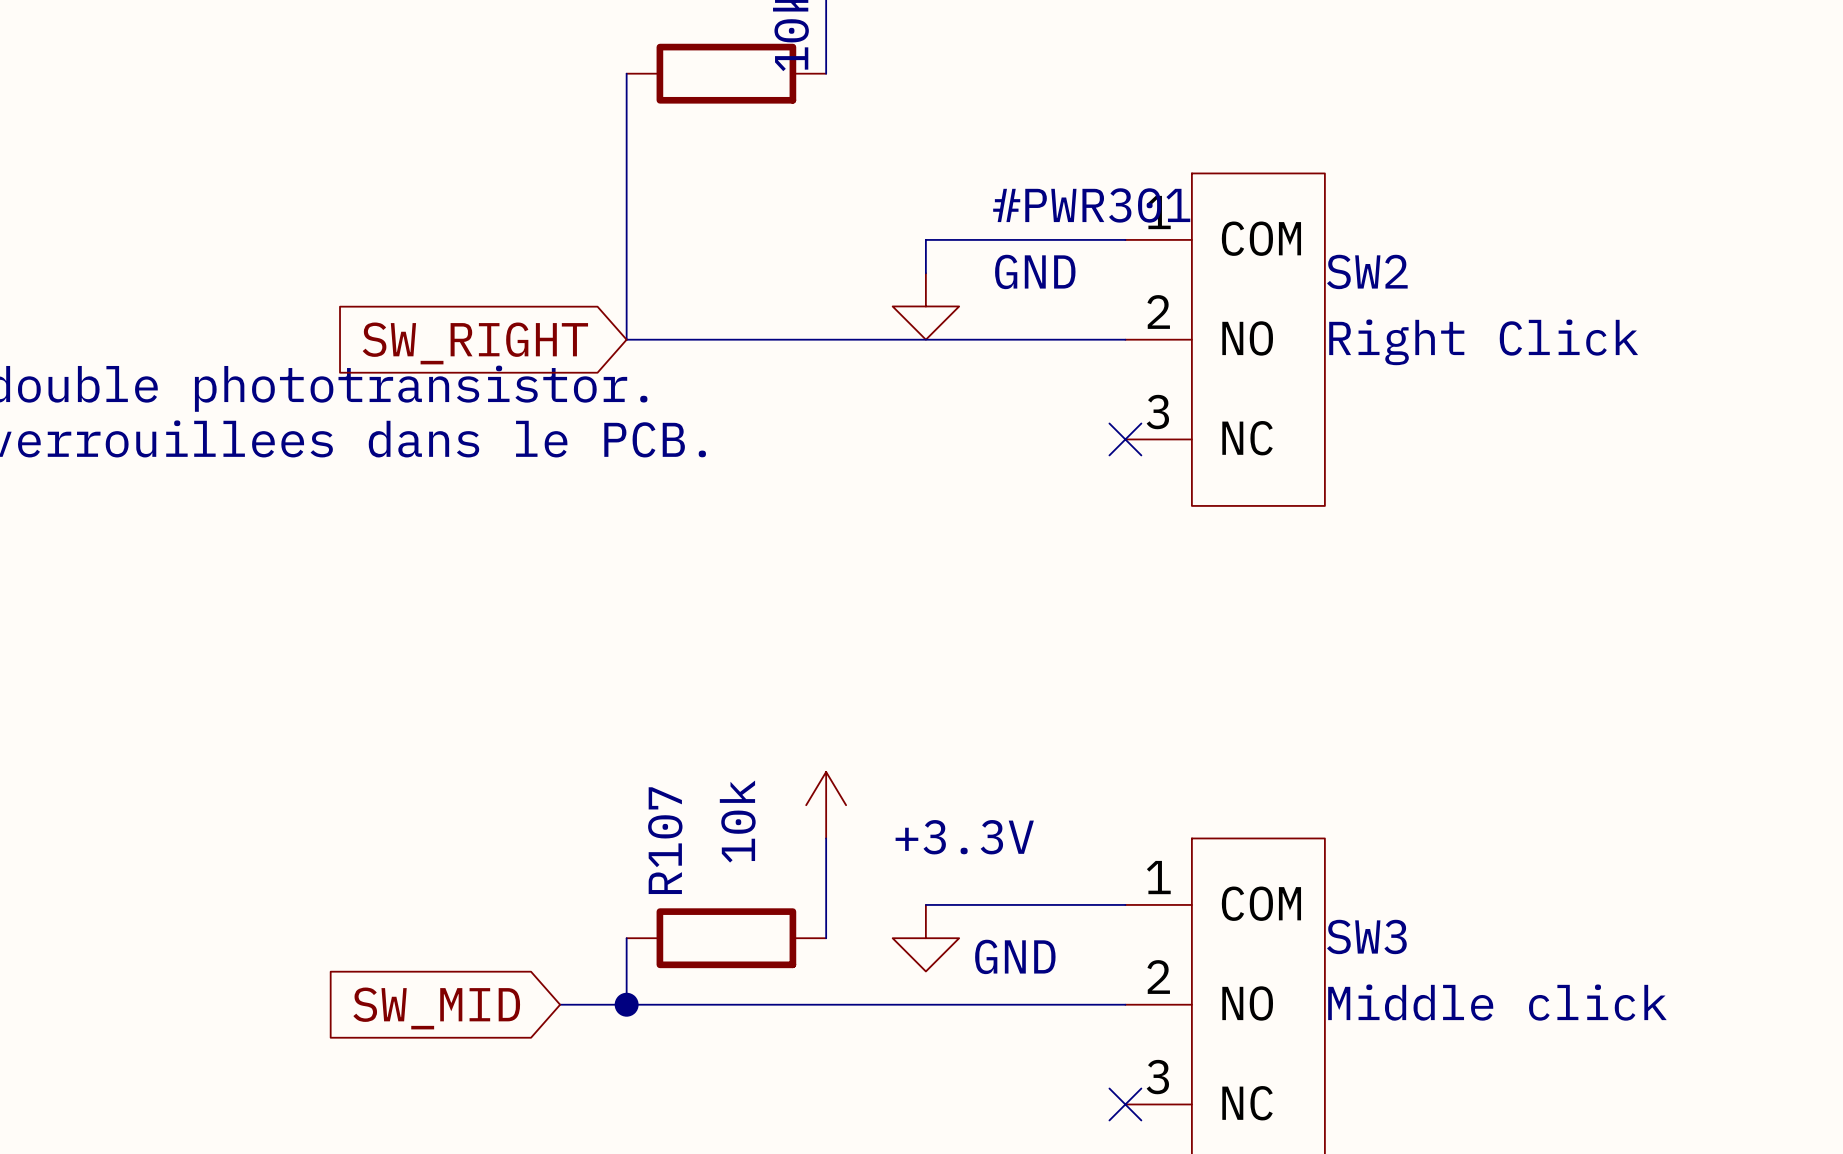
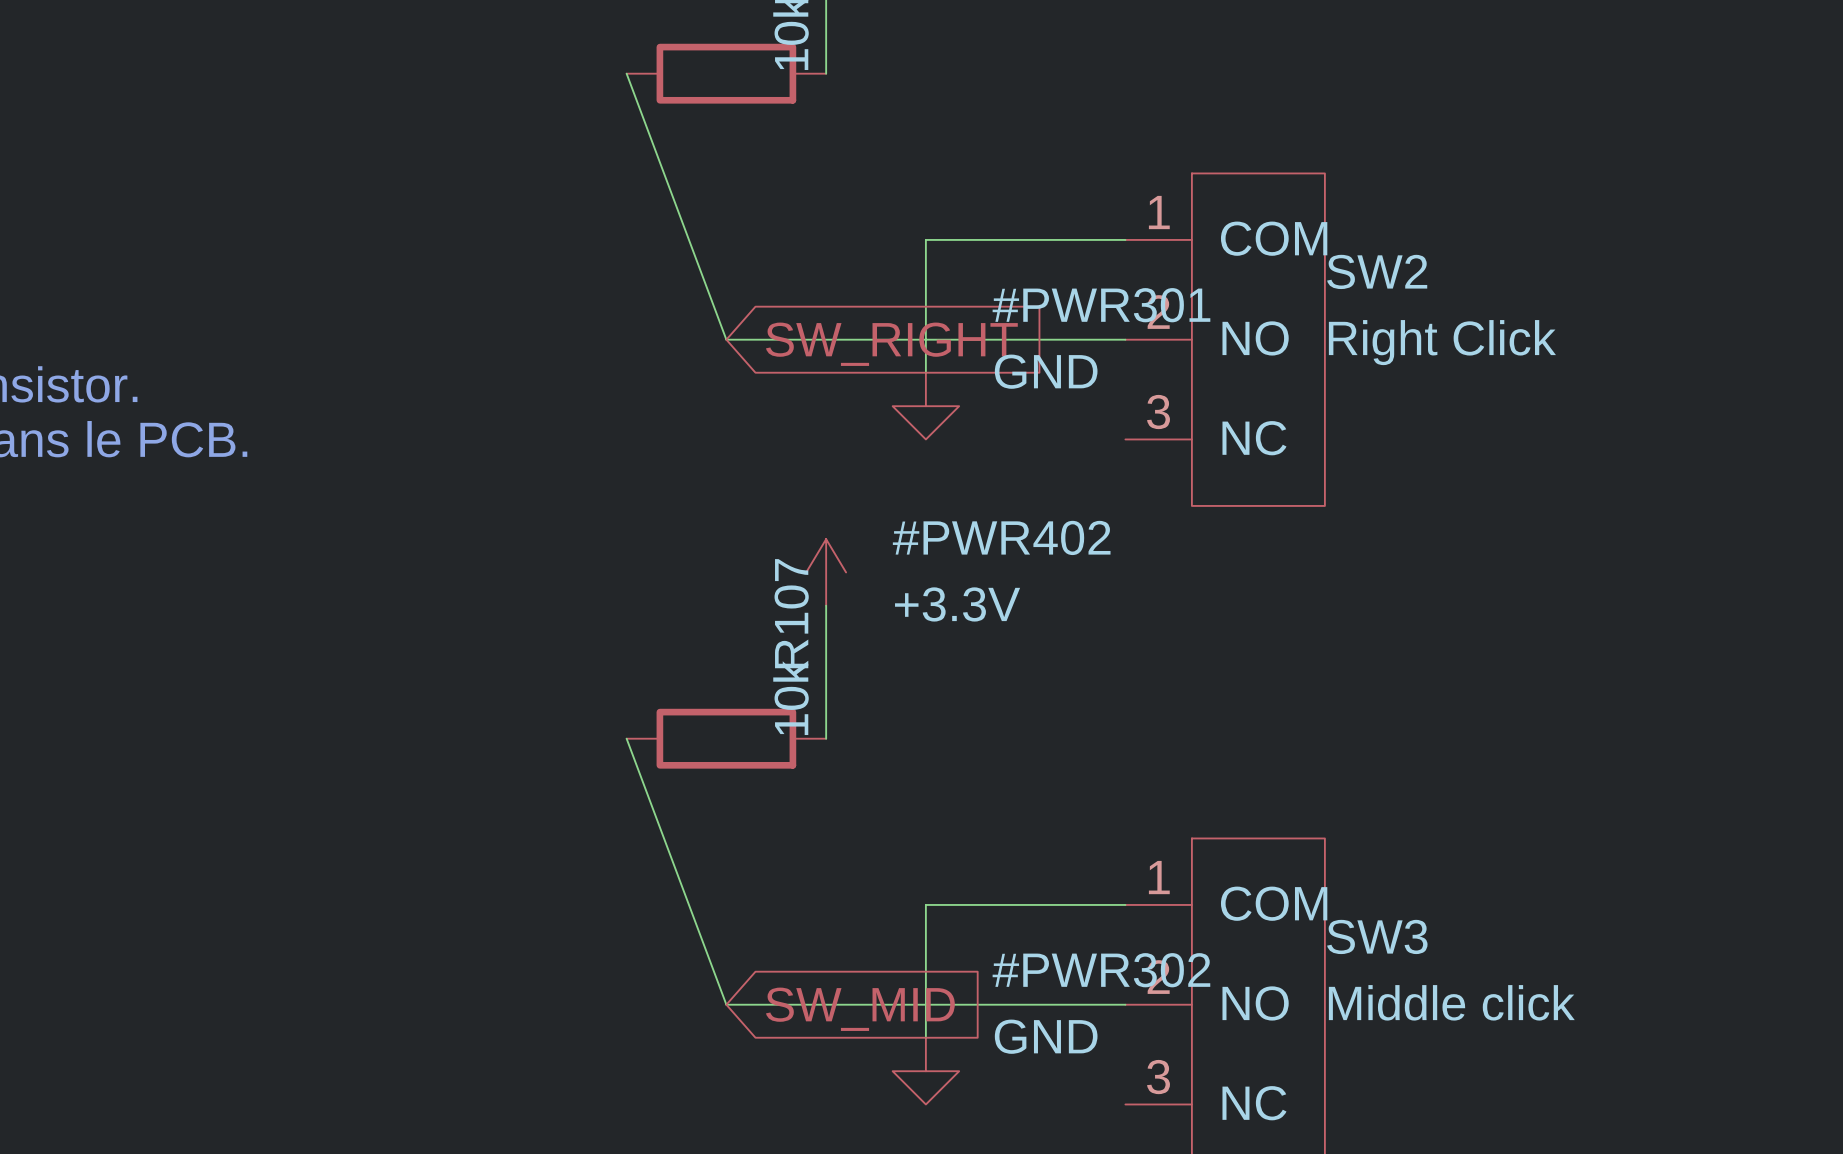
wire: (626, 73) (626, 339) (726, 339) -> (626, 73) (726, 339)
#PWR301 position: GND (925, 306) -> GND (925, 406)
global label rotation: 0° (475, 343) -> 180° (891, 344)
global label position: SW_RIGHT (475, 343) -> SW_RIGHT (891, 344)
no-connect mark: (1125, 439) -> none
#PWR402: none -> +3.3V (826, 572)
wire: none -> (826, 605) (826, 738)
power symbol: +3.3V (826, 805) -> none
R107 value position: 10k (737, 821) -> 10k (791, 697)
wire: (826, 838) (826, 938) -> (925, 273) (925, 372)
R107 name position: R107 (665, 840) -> R107 (791, 613)
wire: none -> (925, 904) (925, 1037)
wire: (626, 938) (626, 1004) -> none
R107 position: (726, 938) -> (726, 738)
power symbol: GND (925, 938) -> none
wire: (560, 1004) (726, 1004) -> (626, 738) (726, 1004)
junction: (626, 1004) -> none
global label rotation: 0° (436, 1008) -> 180° (860, 1009)
global label position: SW_MID (436, 1008) -> SW_MID (860, 1009)
#PWR302: none -> GND (925, 1071)
no-connect mark: (1125, 1104) -> none

